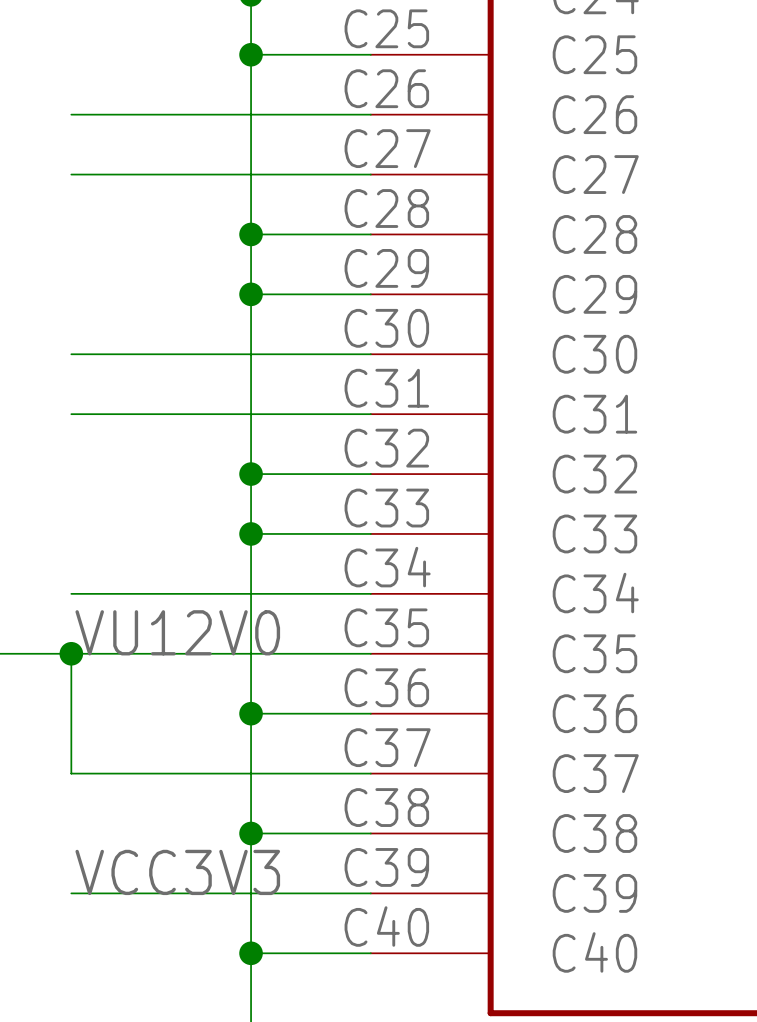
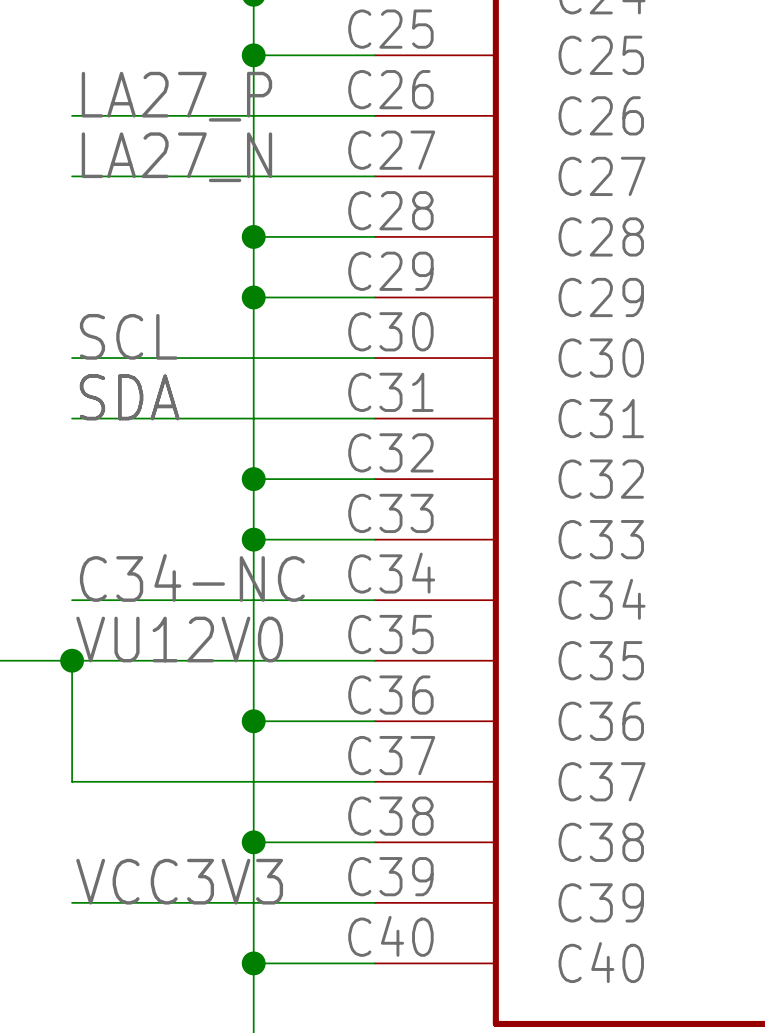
label: none -> LA27_P (176, 96)
label: none -> LA27_N (176, 157)
label: none -> SCL (128, 336)
label: none -> SDA (129, 397)
label: none -> C34-NC (192, 577)

